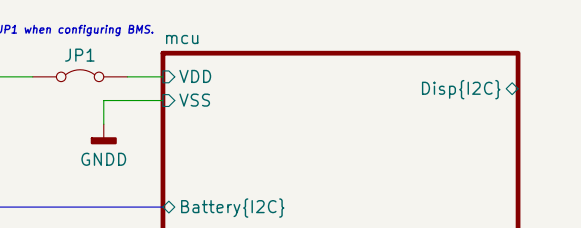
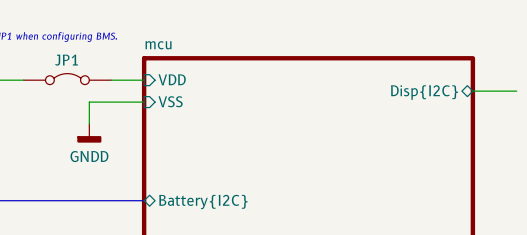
wire: none -> (472, 91) (516, 91)

